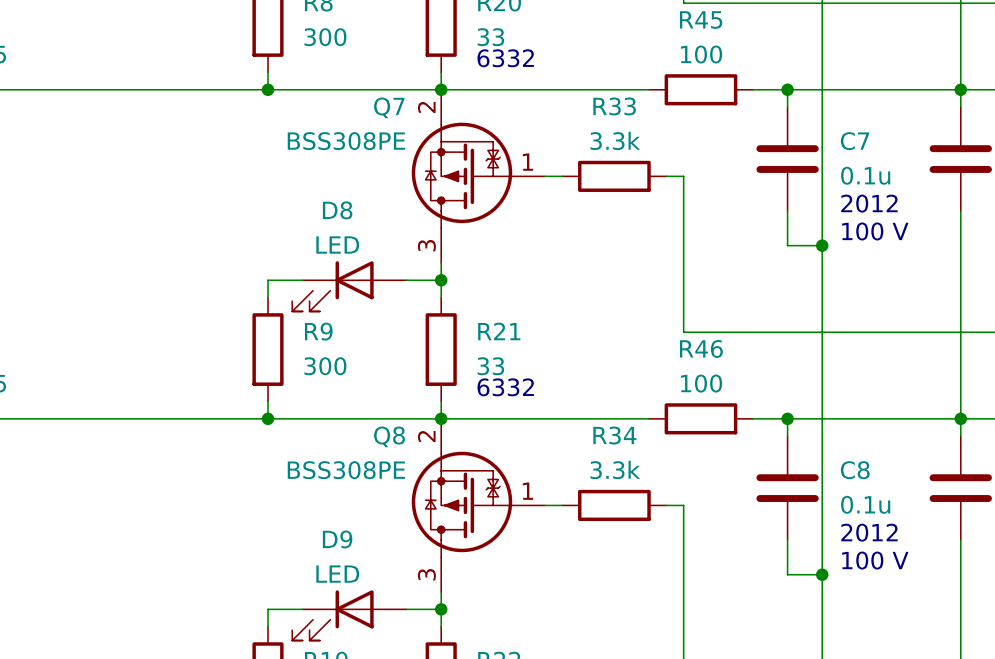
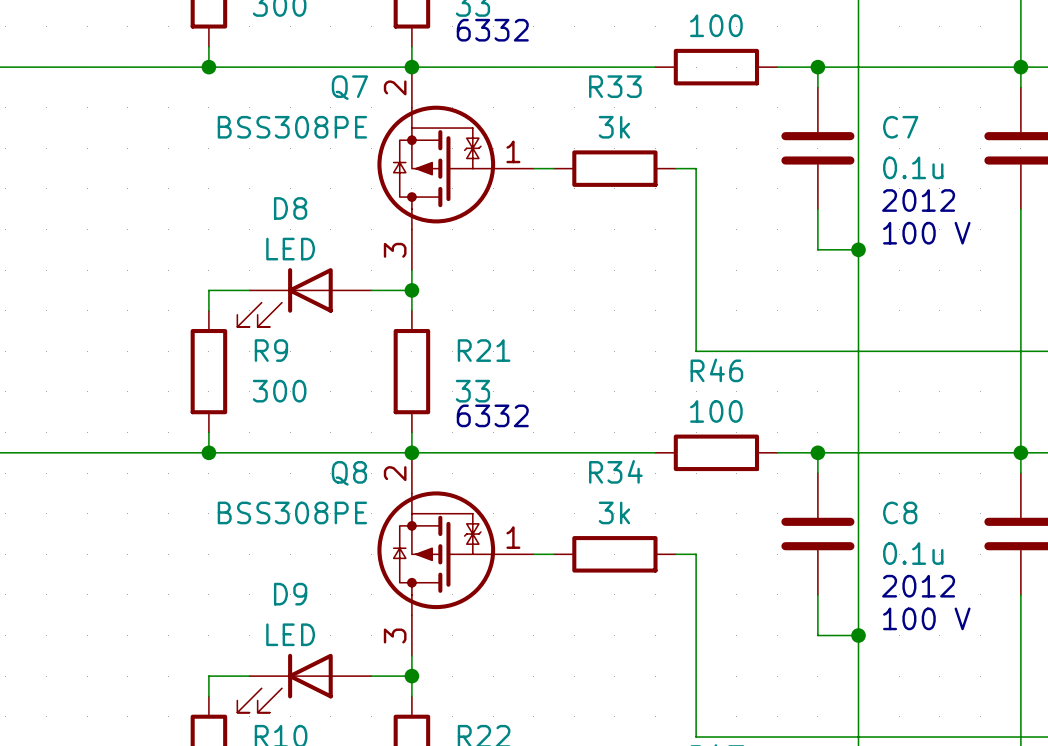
R33 value: 3.3k (615, 140) -> 3k (614, 127)
R34 value: 3.3k (615, 469) -> 3k (614, 512)

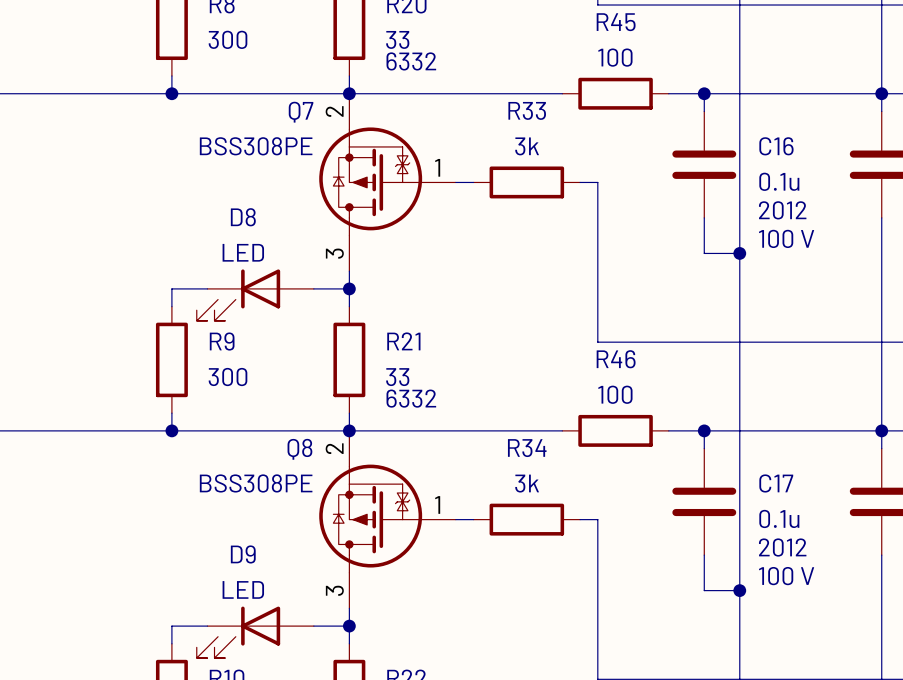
C7 name: C7 (900, 127) -> C16 (776, 146)
C8 name: C8 (900, 512) -> C17 (776, 483)

